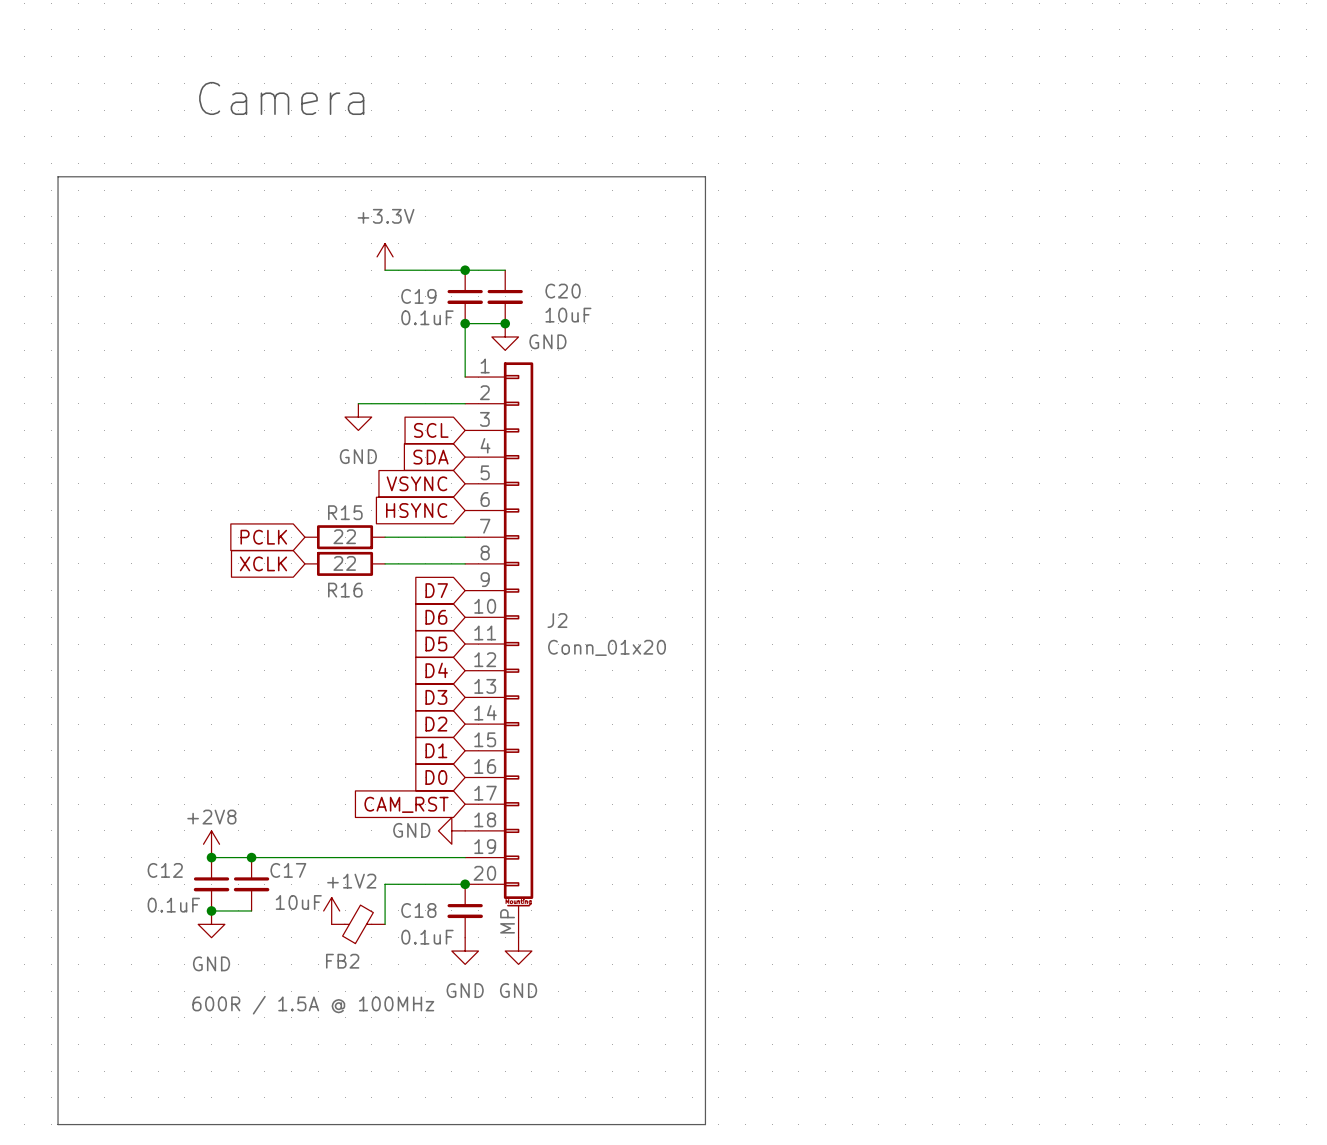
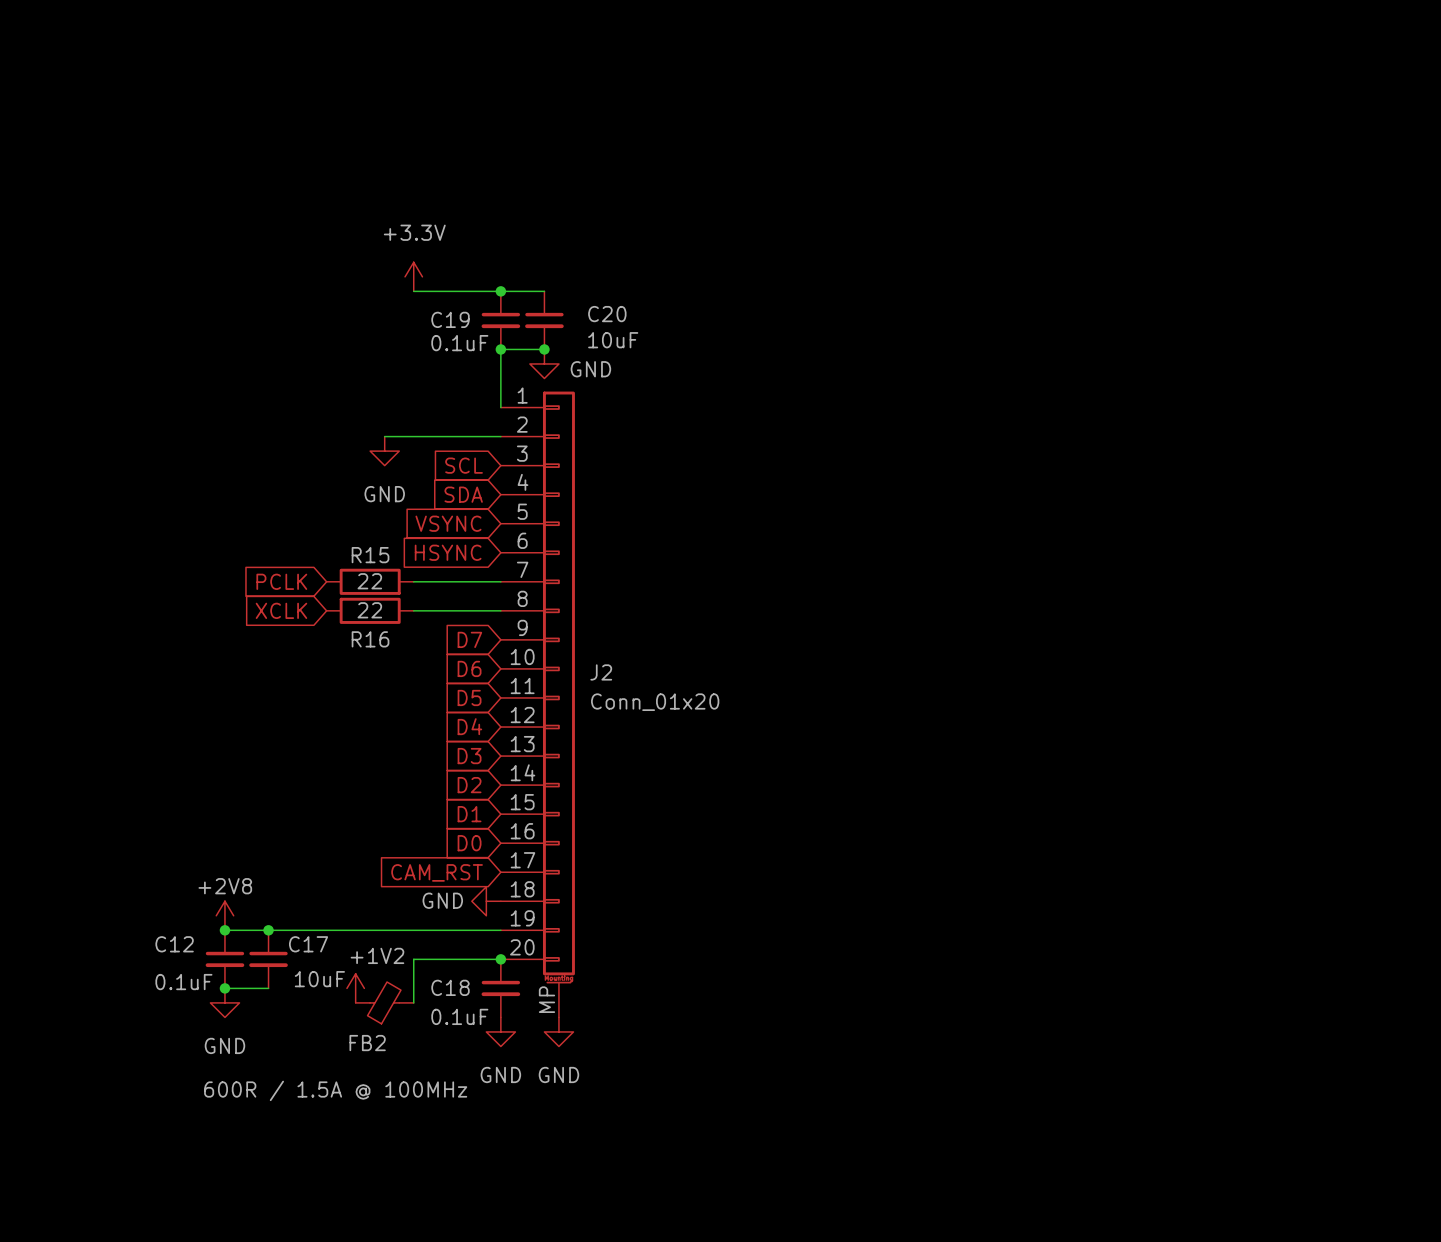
text: Camera (281, 98) -> none
line: (58, 176) (705, 176) (705, 1124) (58, 1124) (58, 176) -> none

